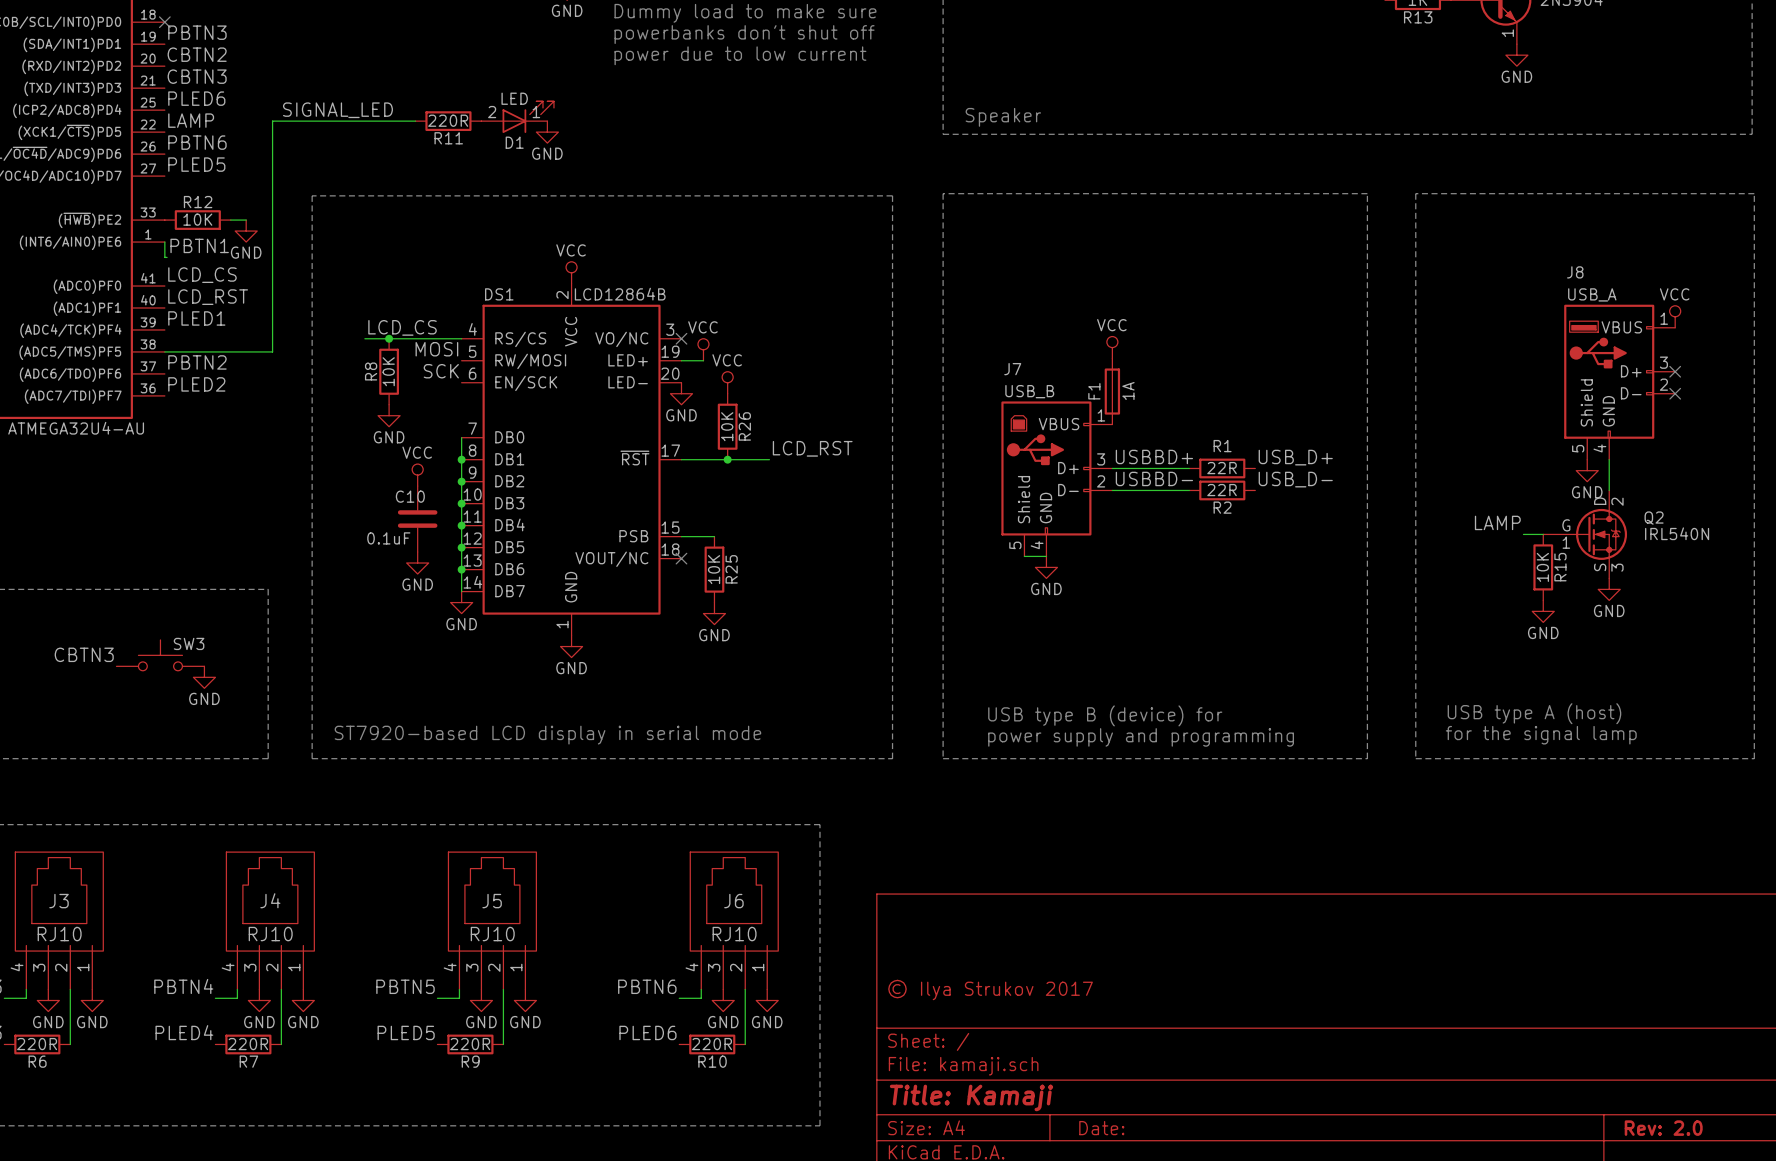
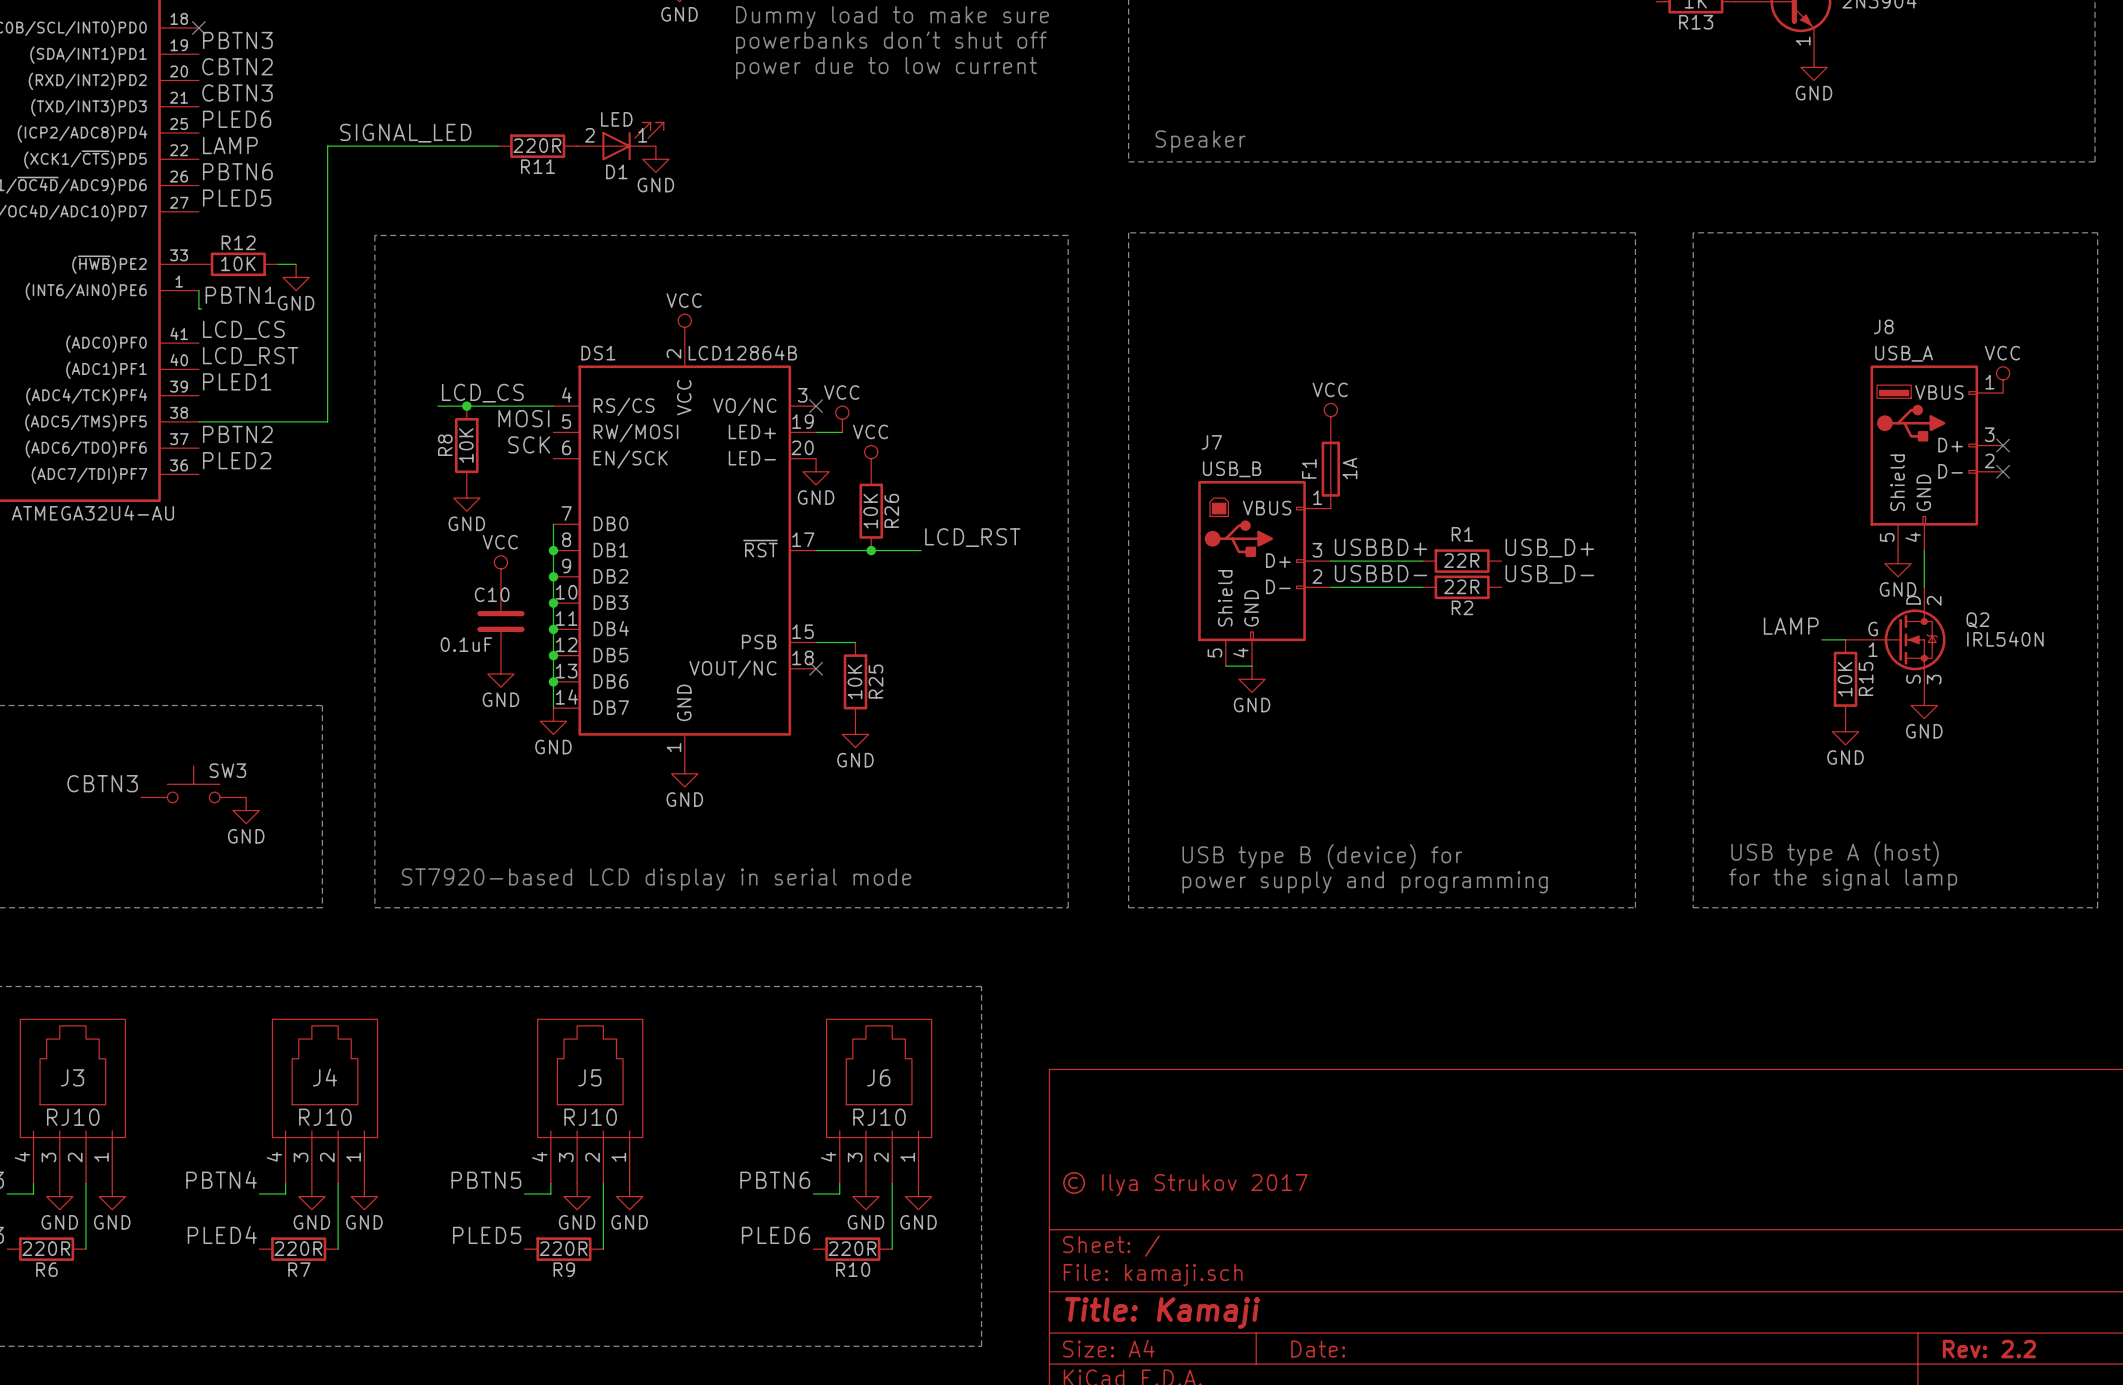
title block: Rev: 2.0 (1663, 1128) -> Rev: 2.2 (1989, 1349)

